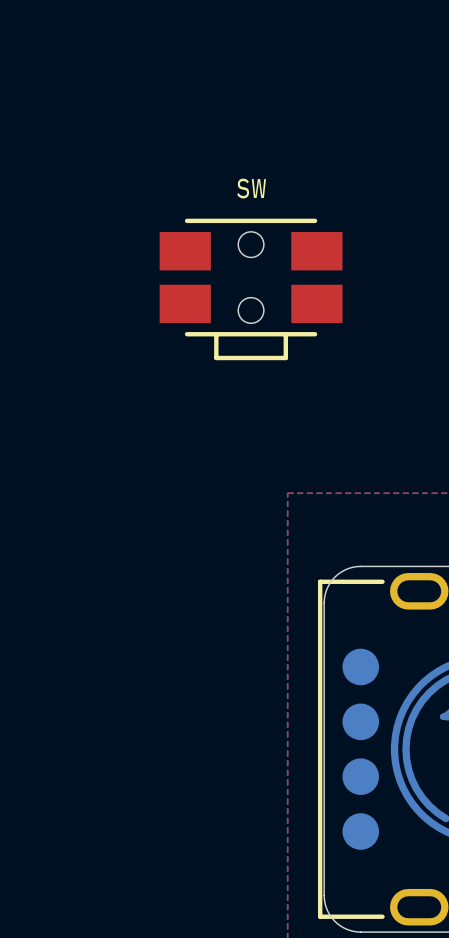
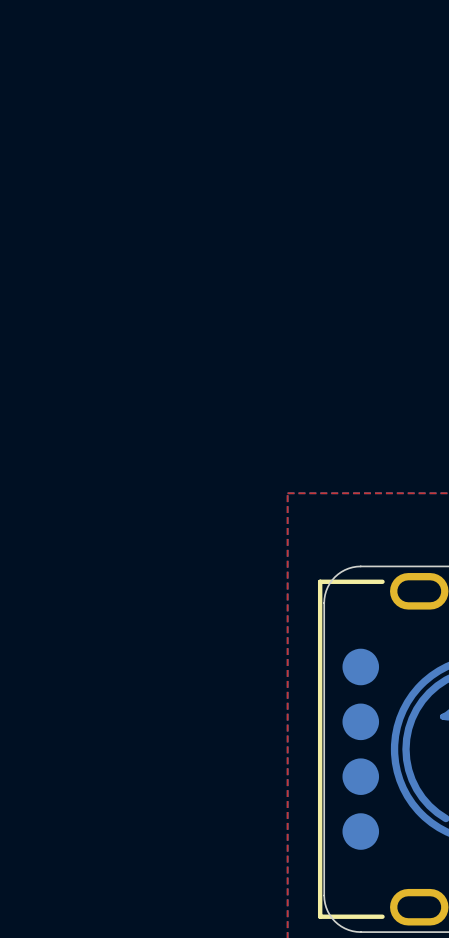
sw: (251, 289) -> none

